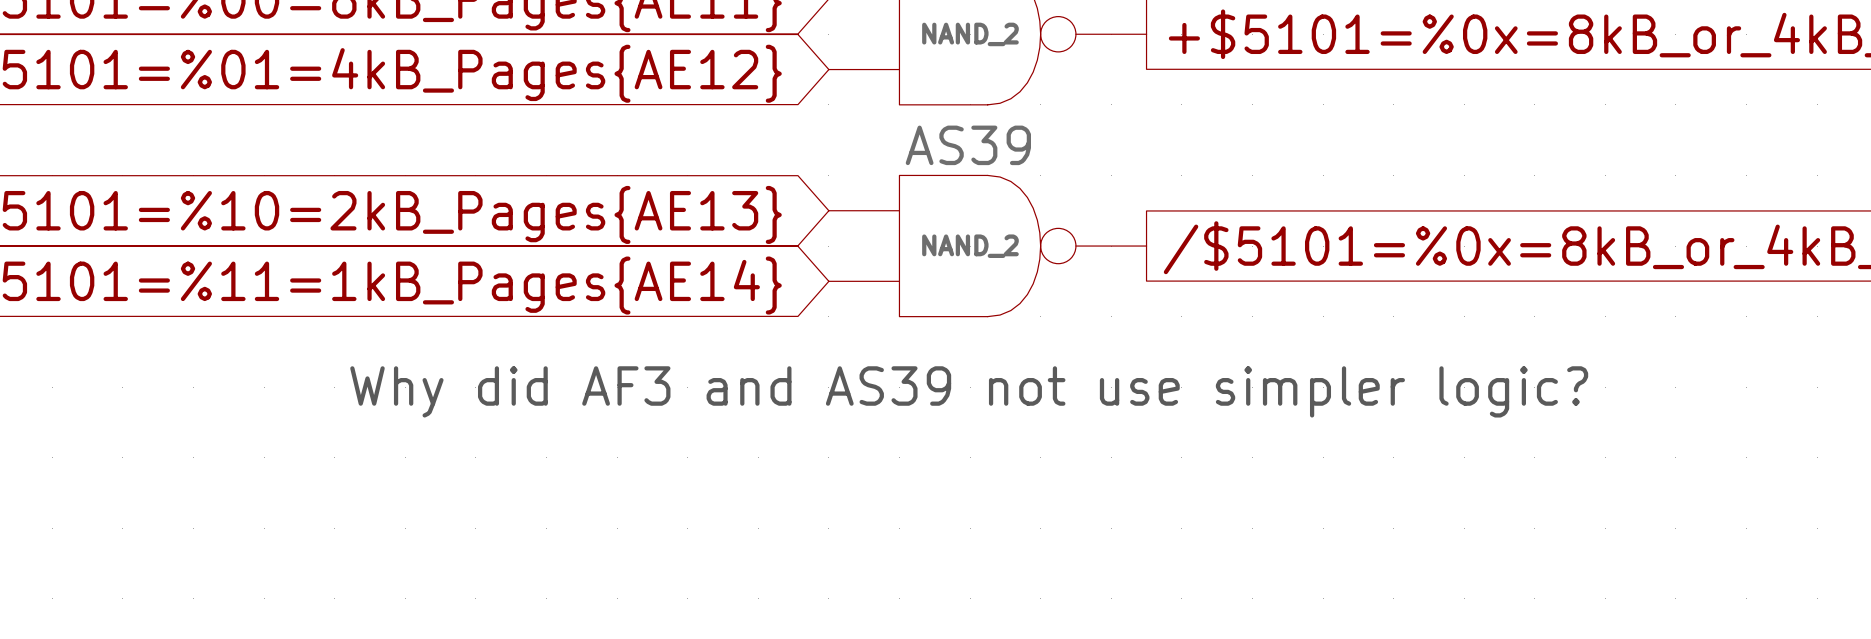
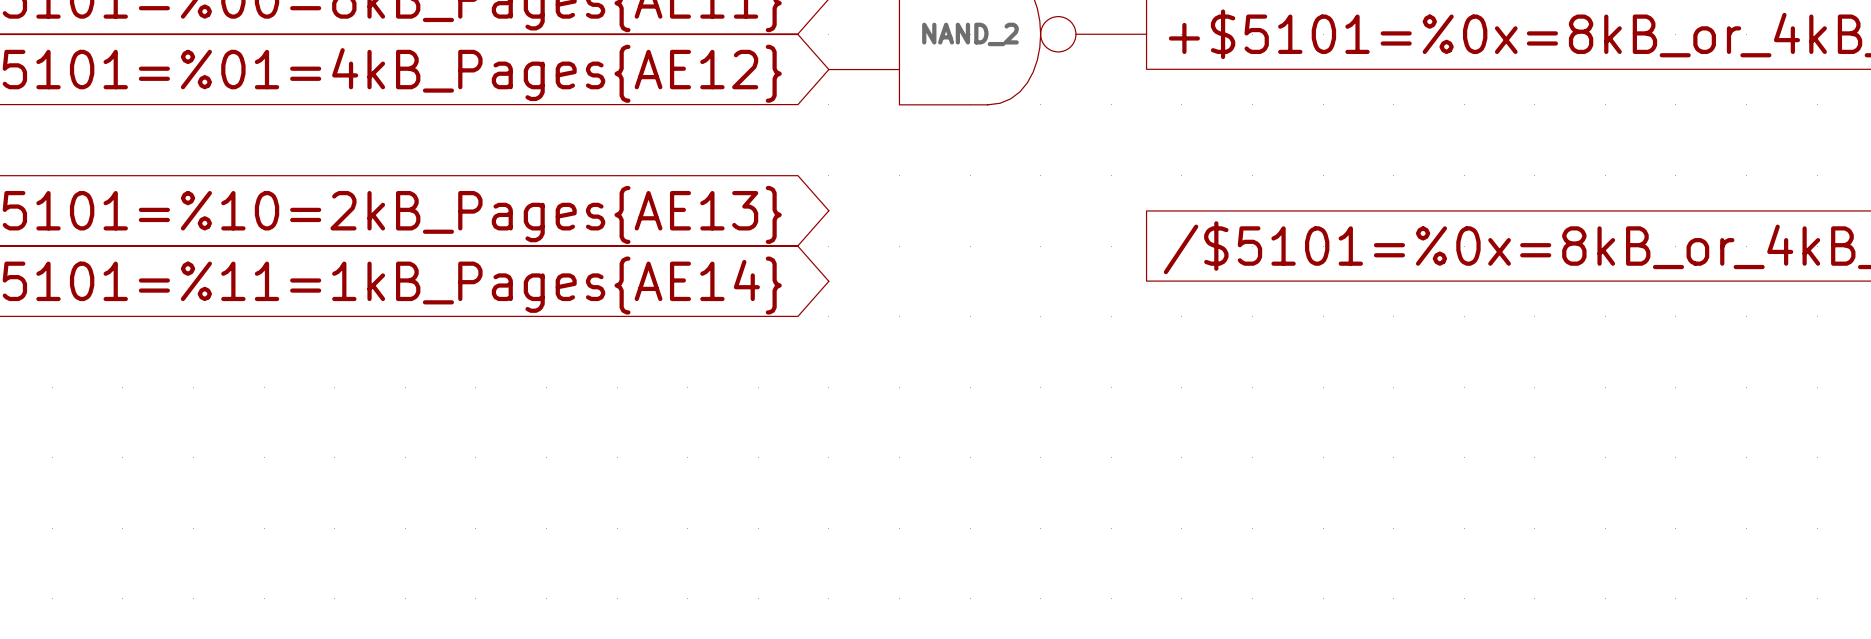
AS39: NAND_2 (987, 246) -> none
text: Why did AF3 and AS39 not use simpler logic? (969, 391) -> none

